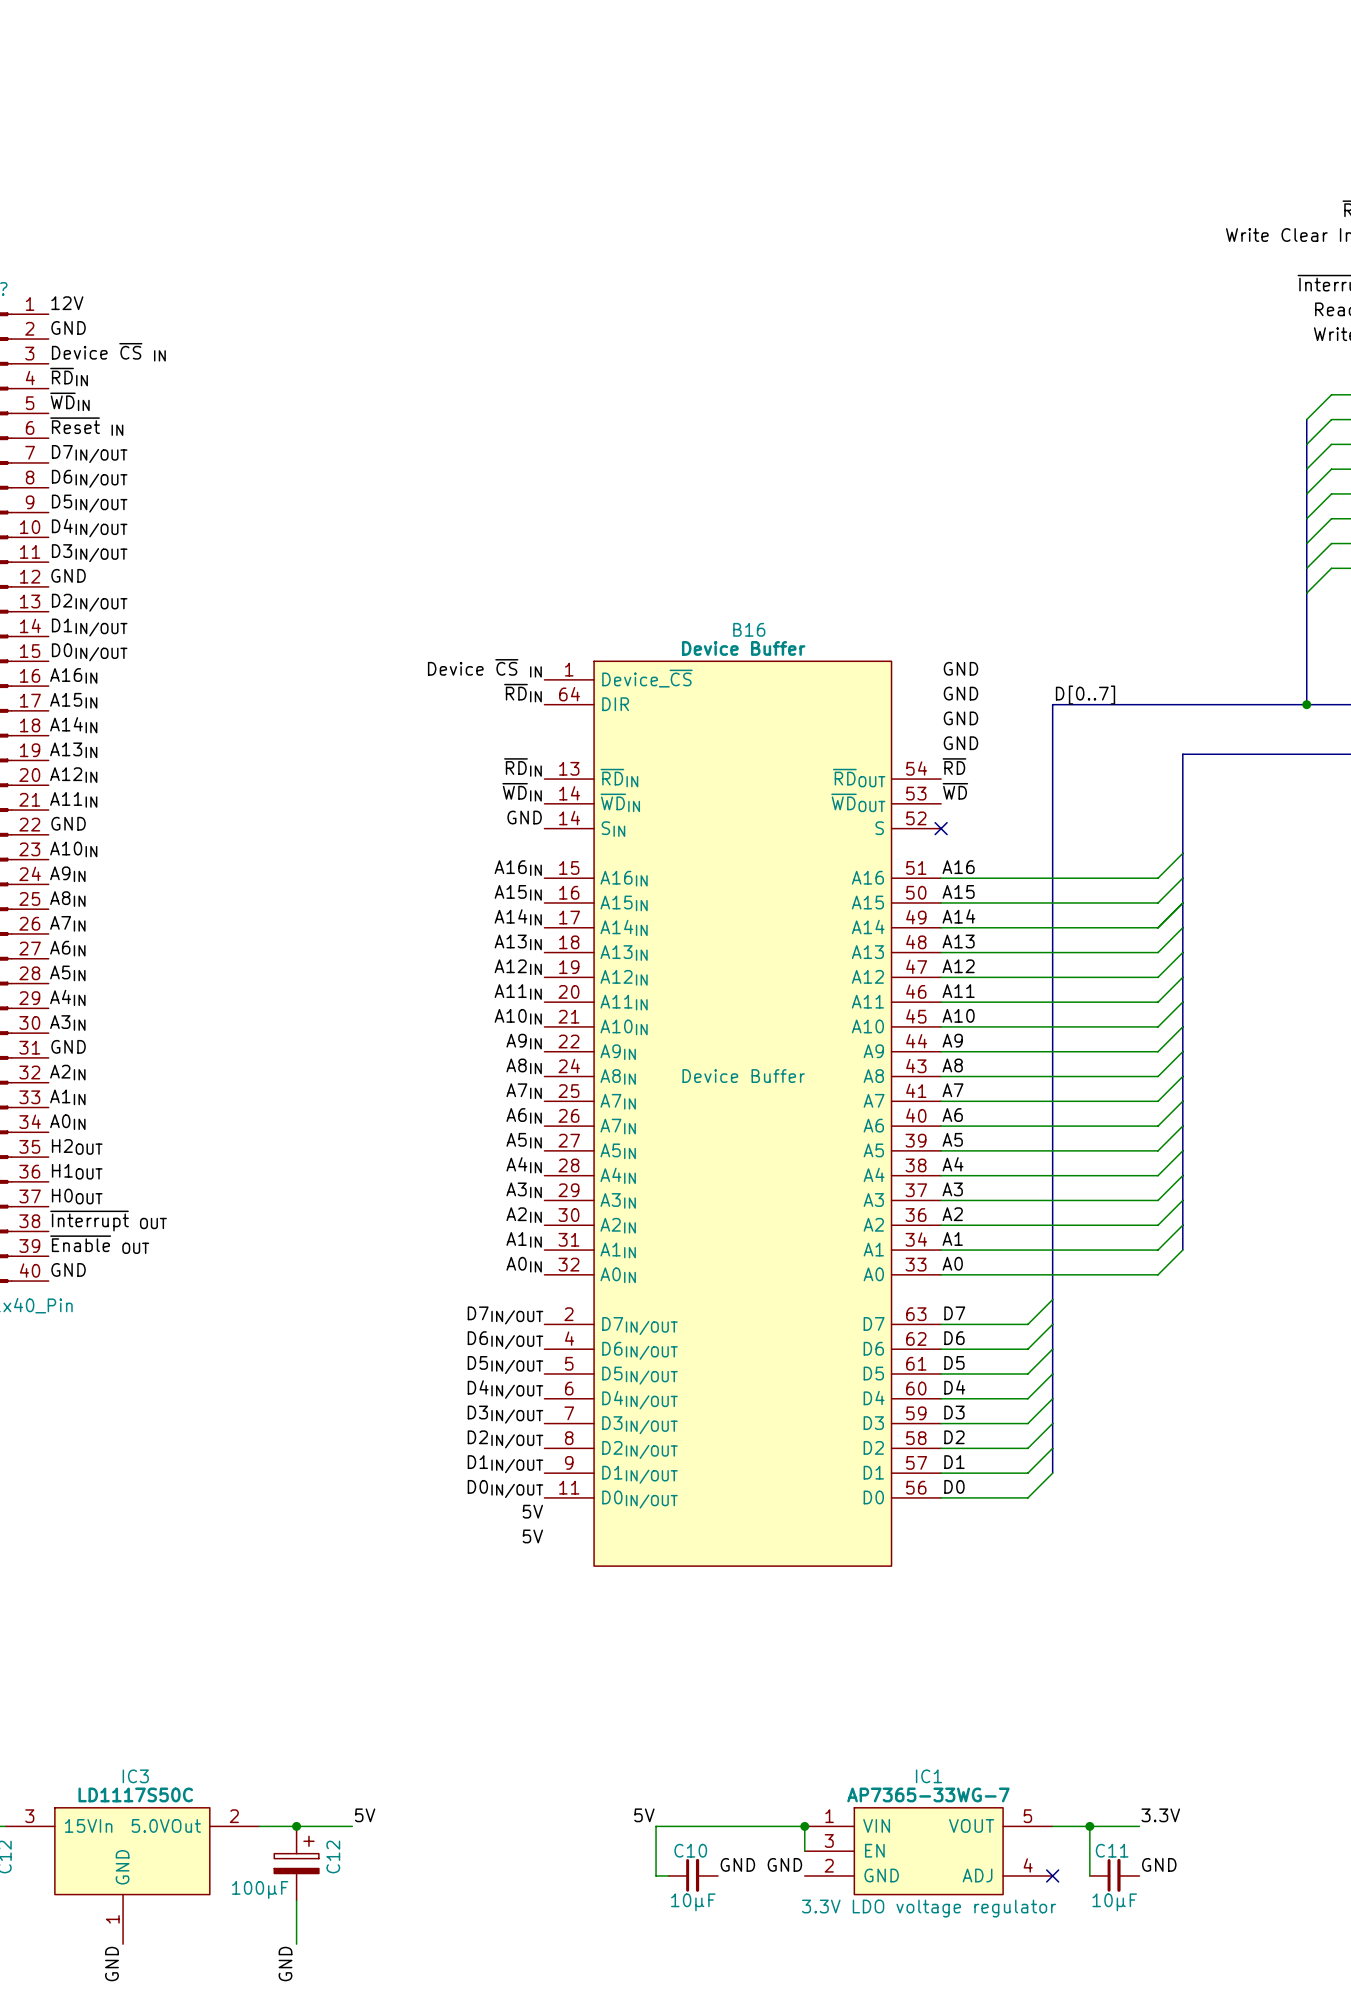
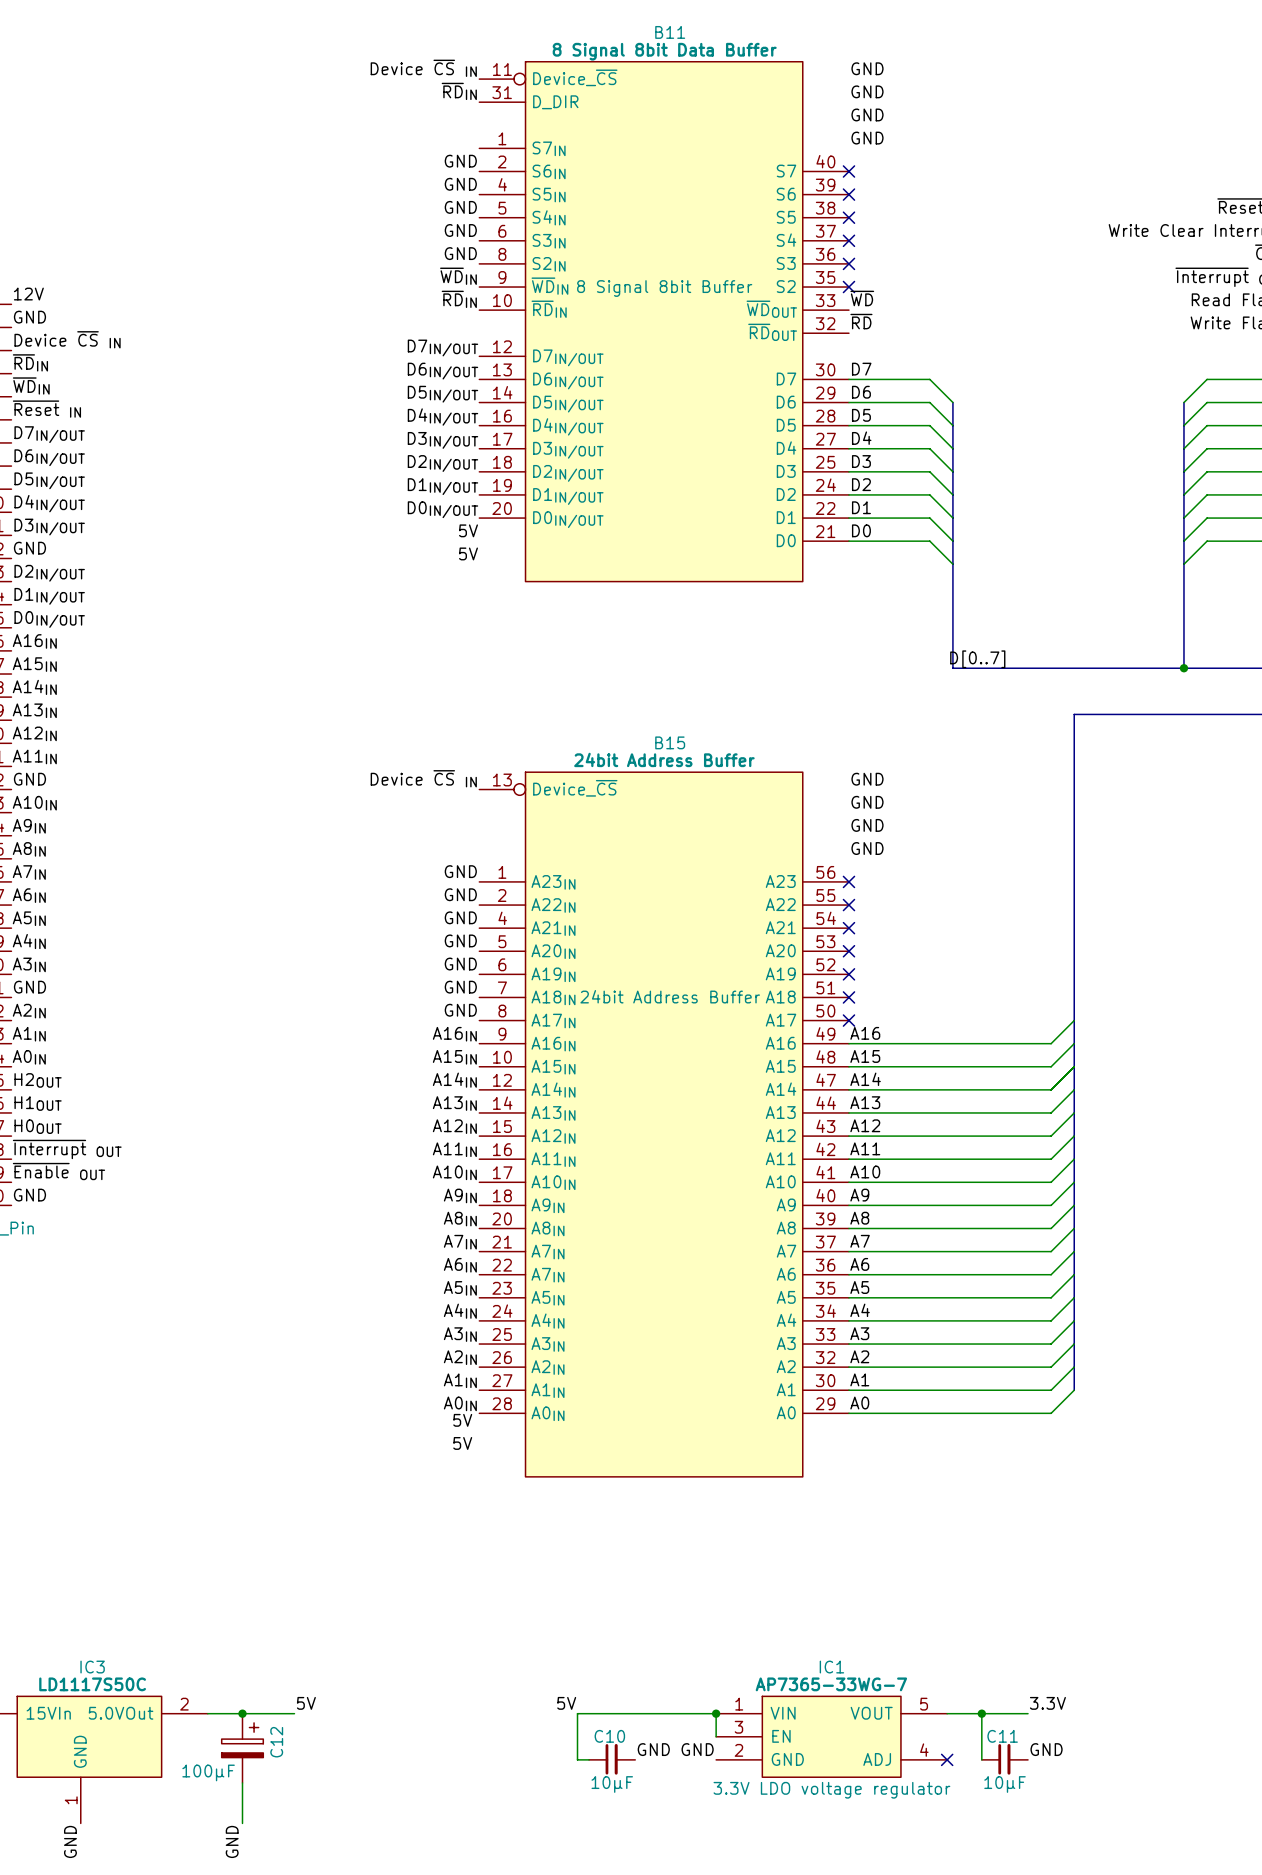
label: none -> Device ~{CS} IN (423, 68)
label: none -> GND (867, 68)
label: none -> ~{RD}IN (459, 91)
label: none -> GND (867, 91)
label: none -> GND (867, 114)
label: none -> GND (867, 138)
label: none -> GND (460, 161)
no-connect mark: none -> (848, 171)
label: none -> GND (460, 184)
no-connect mark: none -> (848, 194)
label: none -> GND (460, 207)
no-connect mark: none -> (848, 217)
label: none -> GND (460, 230)
no-connect mark: none -> (848, 240)
label: none -> GND (460, 253)
no-connect mark: none -> (848, 263)
label: none -> ~{WD}IN (458, 276)
no-connect mark: none -> (848, 287)
label: none -> ~{WD} (862, 298)
label: none -> ~{RD}IN (459, 299)
B11: none -> 8 Signal 8bit Data Buffer (664, 321)
label: none -> ~{RD} (861, 321)
label: none -> D7IN/OUT (442, 347)
label: none -> D7 (861, 369)
label: none -> D6IN/OUT (442, 371)
wire: none -> (848, 379) (929, 379) (952, 402)
label: none -> D6 (861, 392)
label: none -> D5IN/OUT (442, 394)
wire: none -> (848, 402) (929, 402) (952, 425)
label: none -> D5 (861, 415)
label: none -> D4IN/OUT (442, 417)
wire: none -> (848, 425) (929, 425) (952, 448)
label: none -> D4 (861, 438)
label: none -> D3IN/OUT (442, 440)
wire: none -> (848, 448) (929, 448) (952, 471)
label: none -> D3 (861, 461)
label: none -> D2IN/OUT (442, 463)
wire: none -> (848, 471) (929, 471) (952, 494)
label: none -> D2 (861, 484)
label: none -> D1IN/OUT (442, 486)
wire: none -> (848, 494) (929, 494) (952, 518)
label: none -> D1 (861, 507)
label: none -> D0IN/OUT (442, 509)
wire: none -> (848, 518) (929, 518) (952, 541)
label: none -> 5V (468, 530)
label: none -> D0 (861, 530)
wire: none -> (848, 541) (929, 541) (952, 564)
label: none -> 5V (468, 553)
label position: Device ~{CS} IN (484, 668) -> Device ~{CS} IN (423, 778)
label: GND (960, 668) -> none
label: ~{RD}IN (522, 693) -> none
label: GND (960, 693) -> none
bus: (1058, 704) (1052, 704) (1052, 1473) -> (952, 668) (952, 402)
label: GND (960, 718) -> none
label: GND (960, 743) -> none
bus: (1189, 754) (1182, 754) (1182, 1250) -> (1074, 714) (1074, 1390)
label: ~{RD} (954, 766) -> none
label: ~{RD}IN (522, 767) -> none
label: ~{WD} (955, 791) -> none
label: ~{WD}IN (522, 792) -> none
label: GND (524, 817) -> none
label: none -> GND (867, 779)
no-connect mark: (941, 828) -> none
label: none -> GND (867, 802)
wire: (1182, 853) (1158, 878) -> none
label position: A16 (958, 867) -> A16 (865, 1033)
label position: A16IN (518, 868) -> A16IN (454, 1034)
label: none -> GND (867, 825)
wire: (941, 878) (1158, 878) -> none
wire: (1182, 878) (1158, 902) -> none
label position: A15 (958, 891) -> A15 (865, 1056)
label position: A15IN (518, 892) -> A15IN (454, 1057)
label: none -> GND (867, 848)
wire: (941, 902) (1158, 902) -> none
wire: (1182, 902) (1158, 927) (941, 927) -> (1074, 1020) (1051, 1043) (848, 1043)
label position: A14 (958, 916) -> A14 (865, 1079)
label position: A14IN (518, 917) -> A14IN (454, 1080)
label: none -> GND (460, 871)
wire: (1182, 927) (1158, 952) -> none
no-connect mark: none -> (848, 881)
label position: A13 (958, 941) -> A13 (865, 1102)
label position: A13IN (518, 942) -> A13IN (454, 1103)
label: none -> GND (460, 894)
wire: (941, 952) (1158, 952) -> none
wire: (1182, 952) (1158, 977) (941, 977) -> (1074, 1066) (1051, 1089) (848, 1089)
no-connect mark: none -> (848, 905)
label position: A12 (958, 966) -> A12 (865, 1125)
label position: A12IN (518, 967) -> A12IN (454, 1126)
label: none -> GND (460, 917)
wire: (1182, 977) (1158, 1002) (941, 1002) -> (1074, 1089) (1051, 1112) (848, 1112)
no-connect mark: none -> (848, 928)
label position: A11 (958, 991) -> A11 (865, 1148)
label position: A11IN (518, 992) -> A11IN (454, 1149)
label: none -> GND (460, 940)
wire: (1182, 1002) (1158, 1026) (941, 1026) -> (1074, 1112) (1051, 1136) (848, 1136)
no-connect mark: none -> (848, 951)
label position: A10 (958, 1015) -> A10 (865, 1171)
label position: A10IN (518, 1016) -> A10IN (454, 1172)
label: none -> GND (460, 964)
wire: (1182, 1026) (1158, 1051) (941, 1051) -> (1074, 1136) (1051, 1159) (848, 1159)
no-connect mark: none -> (848, 974)
label position: A9 (952, 1040) -> A9 (859, 1195)
label position: A9IN (524, 1041) -> A9IN (460, 1195)
label: none -> GND (460, 987)
wire: (1182, 1051) (1158, 1076) -> none
no-connect mark: none -> (848, 997)
label position: A8 (952, 1065) -> A8 (859, 1218)
label position: A8IN (524, 1066) -> A8IN (460, 1219)
label: none -> GND (460, 1010)
wire: (941, 1076) (1158, 1076) -> none
wire: (1182, 1076) (1158, 1101) (941, 1101) -> (1074, 1182) (1051, 1205) (848, 1205)
no-connect mark: none -> (848, 1020)
label position: A7 (953, 1090) -> A7 (860, 1241)
label position: A7IN (524, 1091) -> A7IN (460, 1242)
wire: (1182, 1101) (1158, 1126) (941, 1126) -> (1074, 1205) (1051, 1228) (848, 1228)
wire: none -> (1074, 1043) (1051, 1066) (848, 1066)
B16: Device Buffer (742, 1113) -> none
label position: A6IN (524, 1115) -> A6IN (460, 1265)
label position: A6 (952, 1115) -> A6 (859, 1264)
wire: (1182, 1126) (1158, 1150) (941, 1150) -> (1074, 1228) (1051, 1251) (848, 1251)
label position: A5 (952, 1139) -> A5 (859, 1287)
label position: A5IN (524, 1140) -> A5IN (460, 1288)
wire: (1182, 1150) (1158, 1175) -> none
label position: A4 (953, 1164) -> A4 (860, 1310)
label position: A4IN (524, 1165) -> A4IN (460, 1311)
wire: (941, 1175) (1158, 1175) -> none
wire: (1182, 1175) (1158, 1200) (941, 1200) -> (1074, 1274) (1051, 1297) (848, 1297)
label position: A3 (952, 1189) -> A3 (859, 1333)
label position: A3IN (524, 1190) -> A3IN (460, 1334)
B15: none -> 24bit Address Buffer (664, 1124)
wire: (1182, 1200) (1158, 1225) (941, 1225) -> (1074, 1297) (1051, 1320) (848, 1320)
label position: A2 (952, 1214) -> A2 (859, 1356)
label position: A2IN (524, 1215) -> A2IN (460, 1357)
wire: (1182, 1225) (1158, 1250) (941, 1250) -> (1074, 1320) (1051, 1344) (848, 1344)
wire: none -> (1074, 1159) (1051, 1182) (848, 1182)
label position: A1 (952, 1238) -> A1 (859, 1379)
label position: A1IN (524, 1239) -> A1IN (460, 1380)
wire: (1182, 1250) (1158, 1274) (941, 1274) -> (1074, 1344) (1051, 1367) (848, 1367)
label position: A0 (952, 1263) -> A0 (859, 1403)
label position: A0IN (524, 1264) -> A0IN (460, 1403)
wire: (1052, 1299) (1027, 1324) (941, 1324) -> none
label: D7 (954, 1313) -> none
label: D7IN/OUT (505, 1315) -> none
wire: (1052, 1324) (1027, 1349) (941, 1349) -> none
wire: none -> (1074, 1251) (1051, 1274) (848, 1274)
label: D6 (954, 1338) -> none
label: D6IN/OUT (505, 1340) -> none
wire: (1052, 1349) (1027, 1373) (941, 1373) -> none
label: D5 (954, 1362) -> none
label: D5IN/OUT (505, 1365) -> none
wire: (1052, 1373) (1027, 1398) (941, 1398) -> none
label: D4 (954, 1387) -> none
label: D4IN/OUT (505, 1389) -> none
wire: (1052, 1398) (1027, 1423) (941, 1423) -> none
label: D3 (954, 1412) -> none
label: D3IN/OUT (505, 1414) -> none
wire: (1052, 1423) (1027, 1448) (941, 1448) -> none
label: D2 (954, 1437) -> none
label: D2IN/OUT (505, 1439) -> none
wire: (1052, 1448) (1027, 1473) (941, 1473) -> none
wire: none -> (1074, 1367) (1051, 1390) (848, 1390)
label: D1 (954, 1462) -> none
label: D1IN/OUT (505, 1464) -> none
wire: (1052, 1473) (1027, 1497) (941, 1497) -> none
wire: none -> (1074, 1390) (1051, 1413) (848, 1413)
label: D0 (954, 1486) -> none
label: D0IN/OUT (505, 1488) -> none

